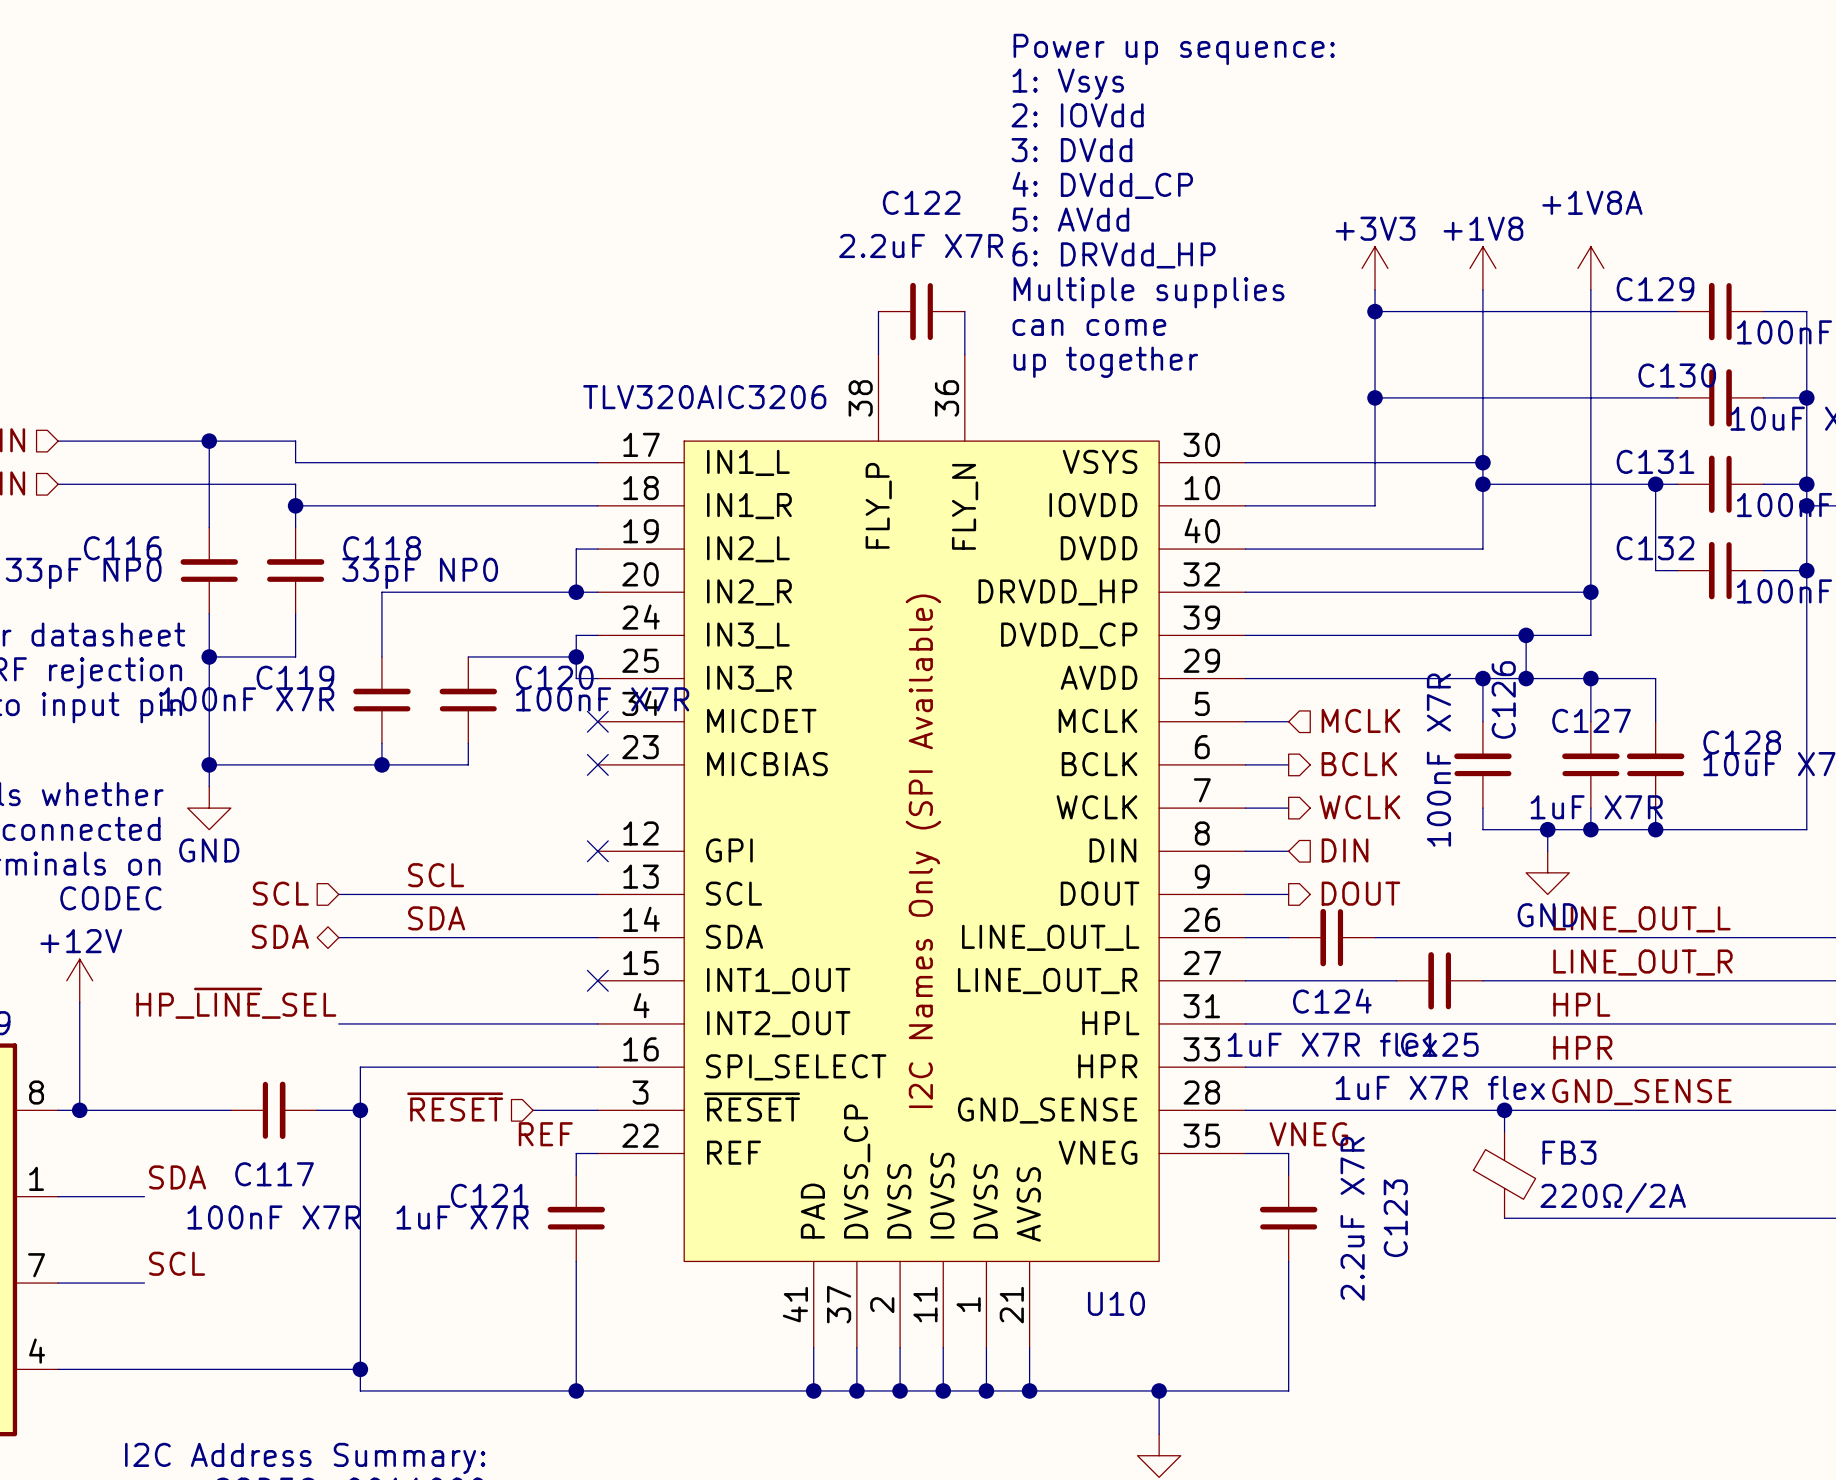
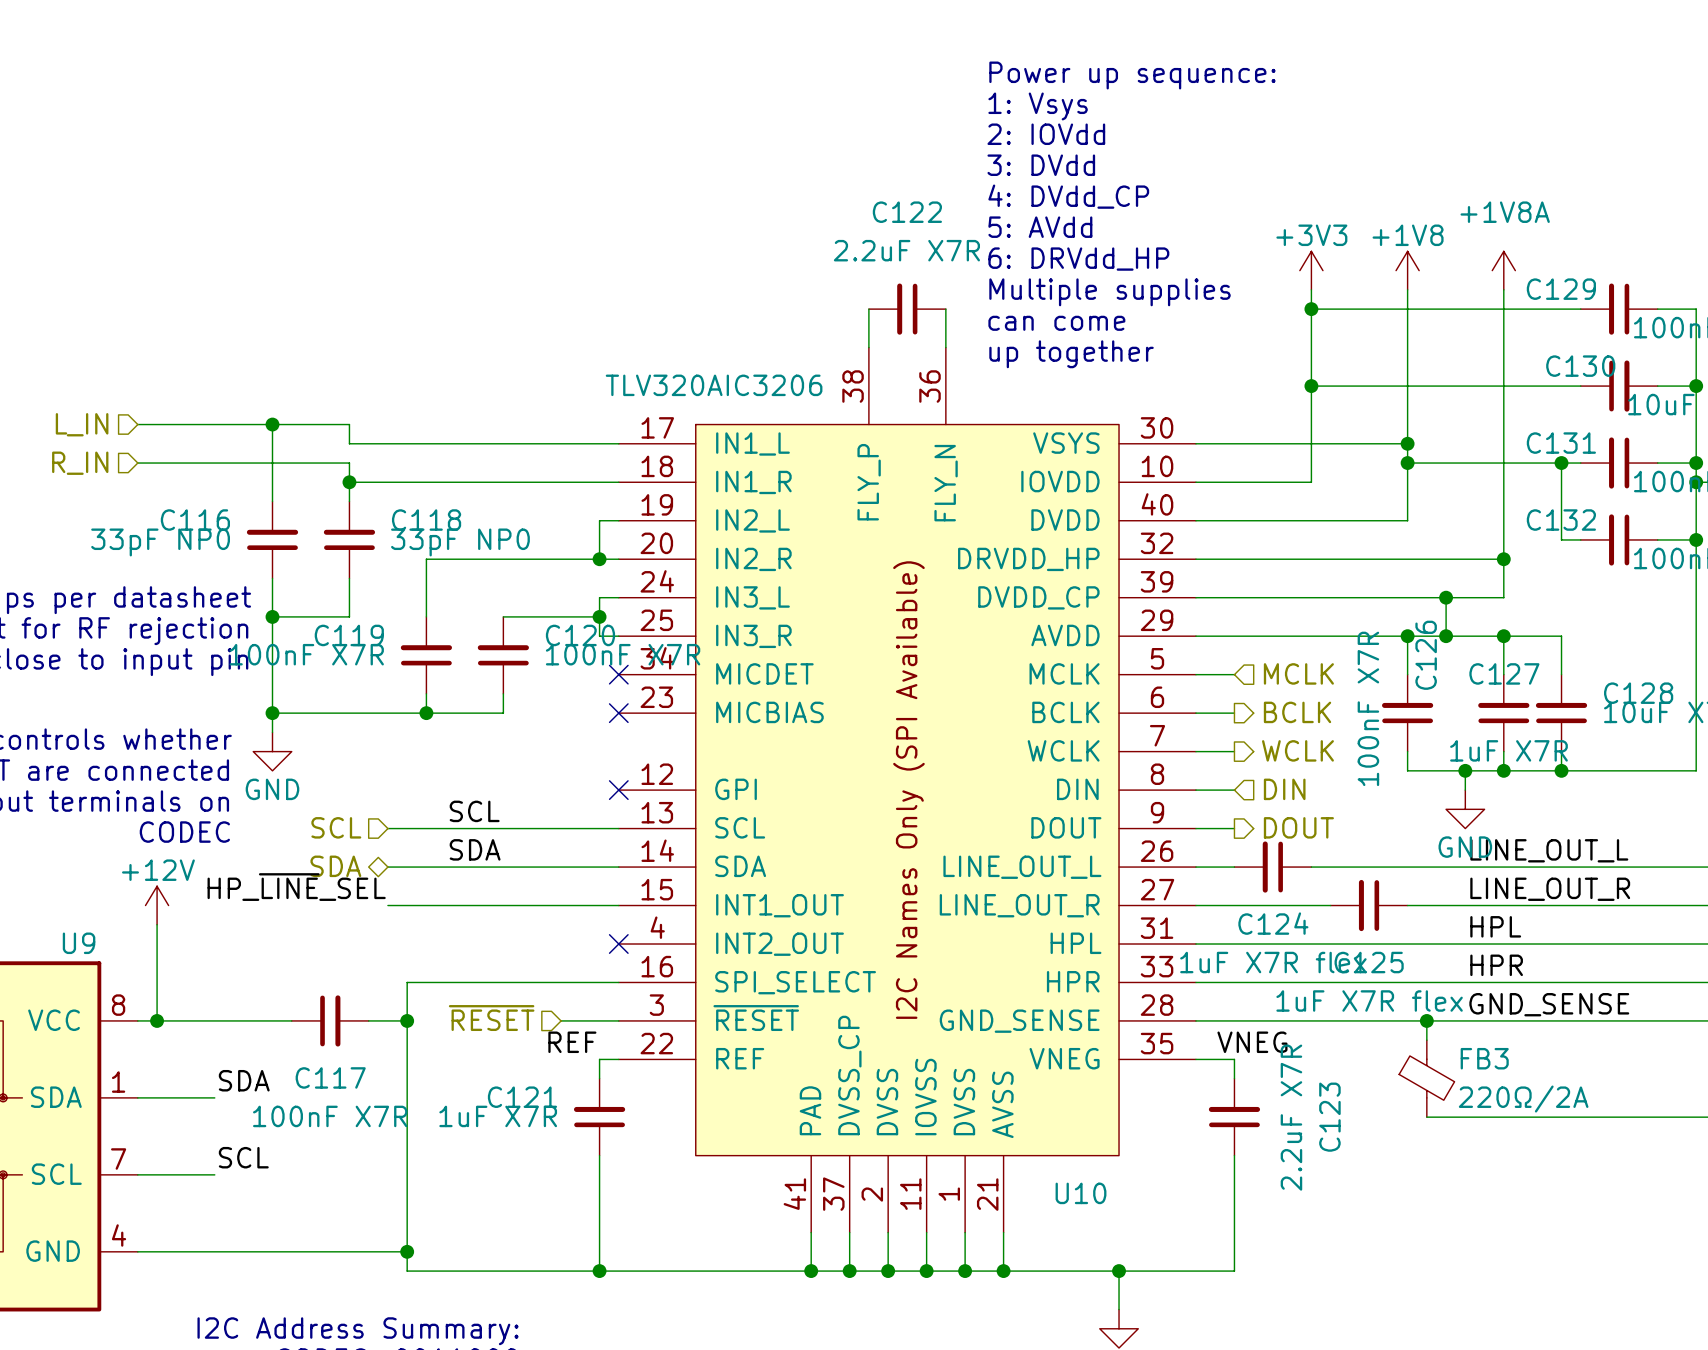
no-connect mark position: (597, 980) -> (618, 944)
label position: HP_~{LINE}_SEL (236, 1003) -> HP_~{LINE}_SEL (296, 887)
wire: (338, 1023) (597, 1023) -> (387, 905) (618, 905)

